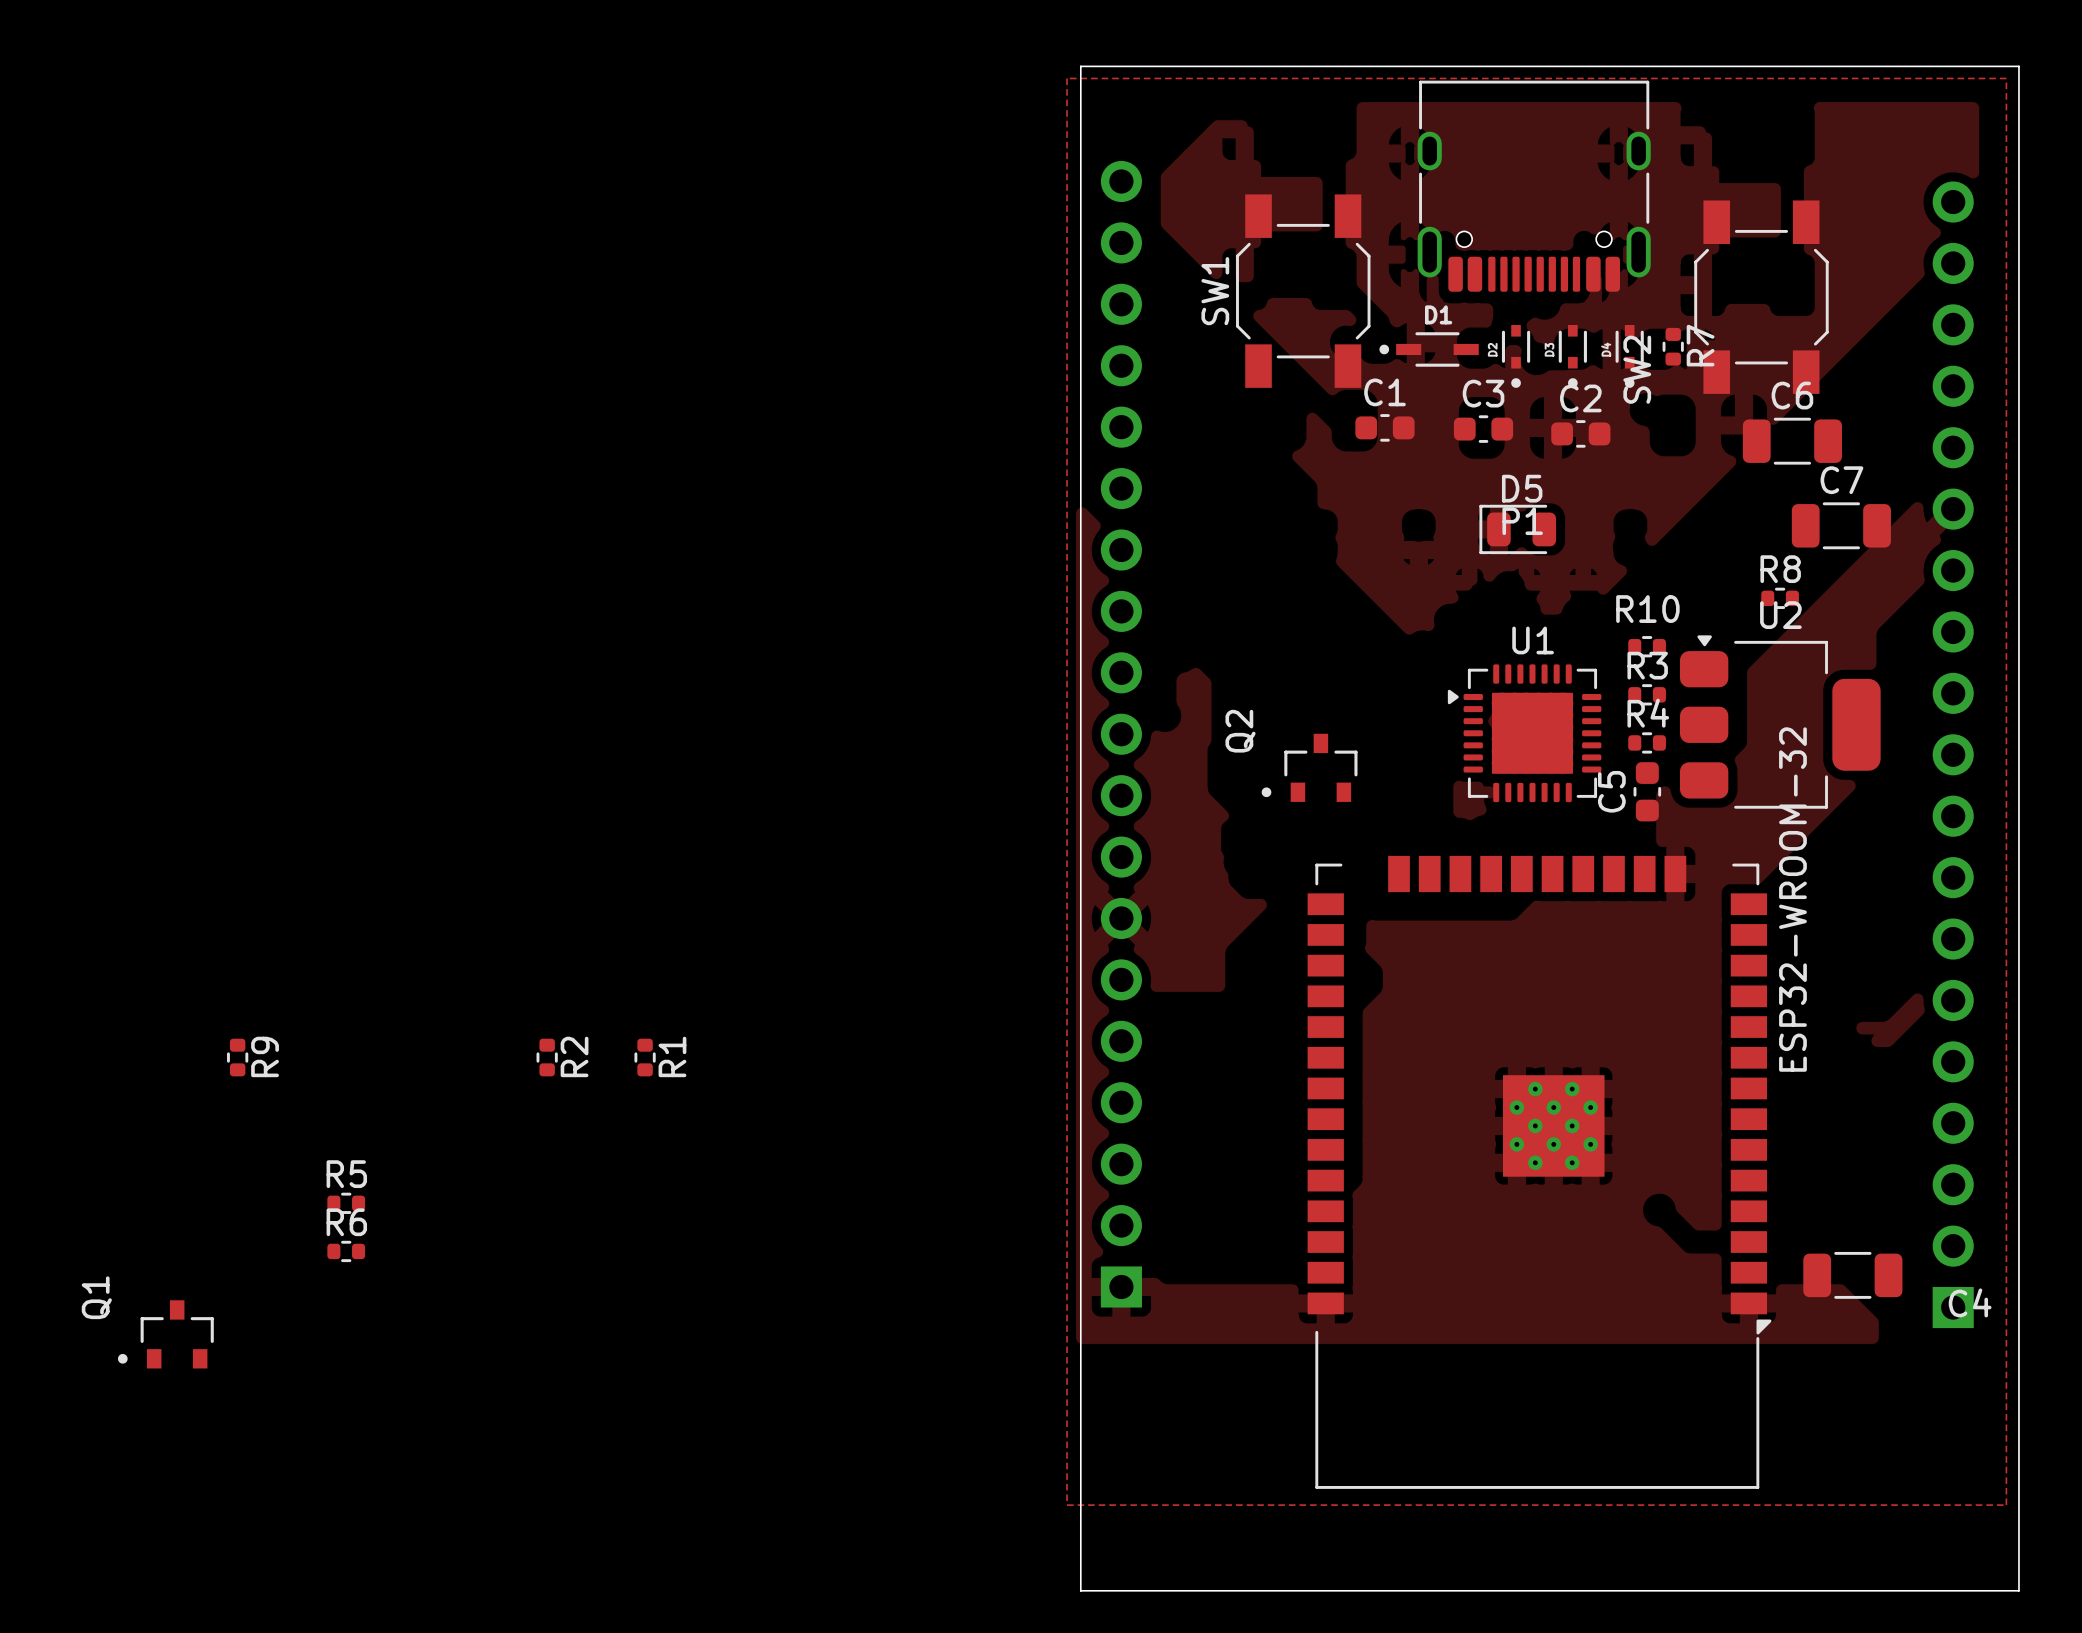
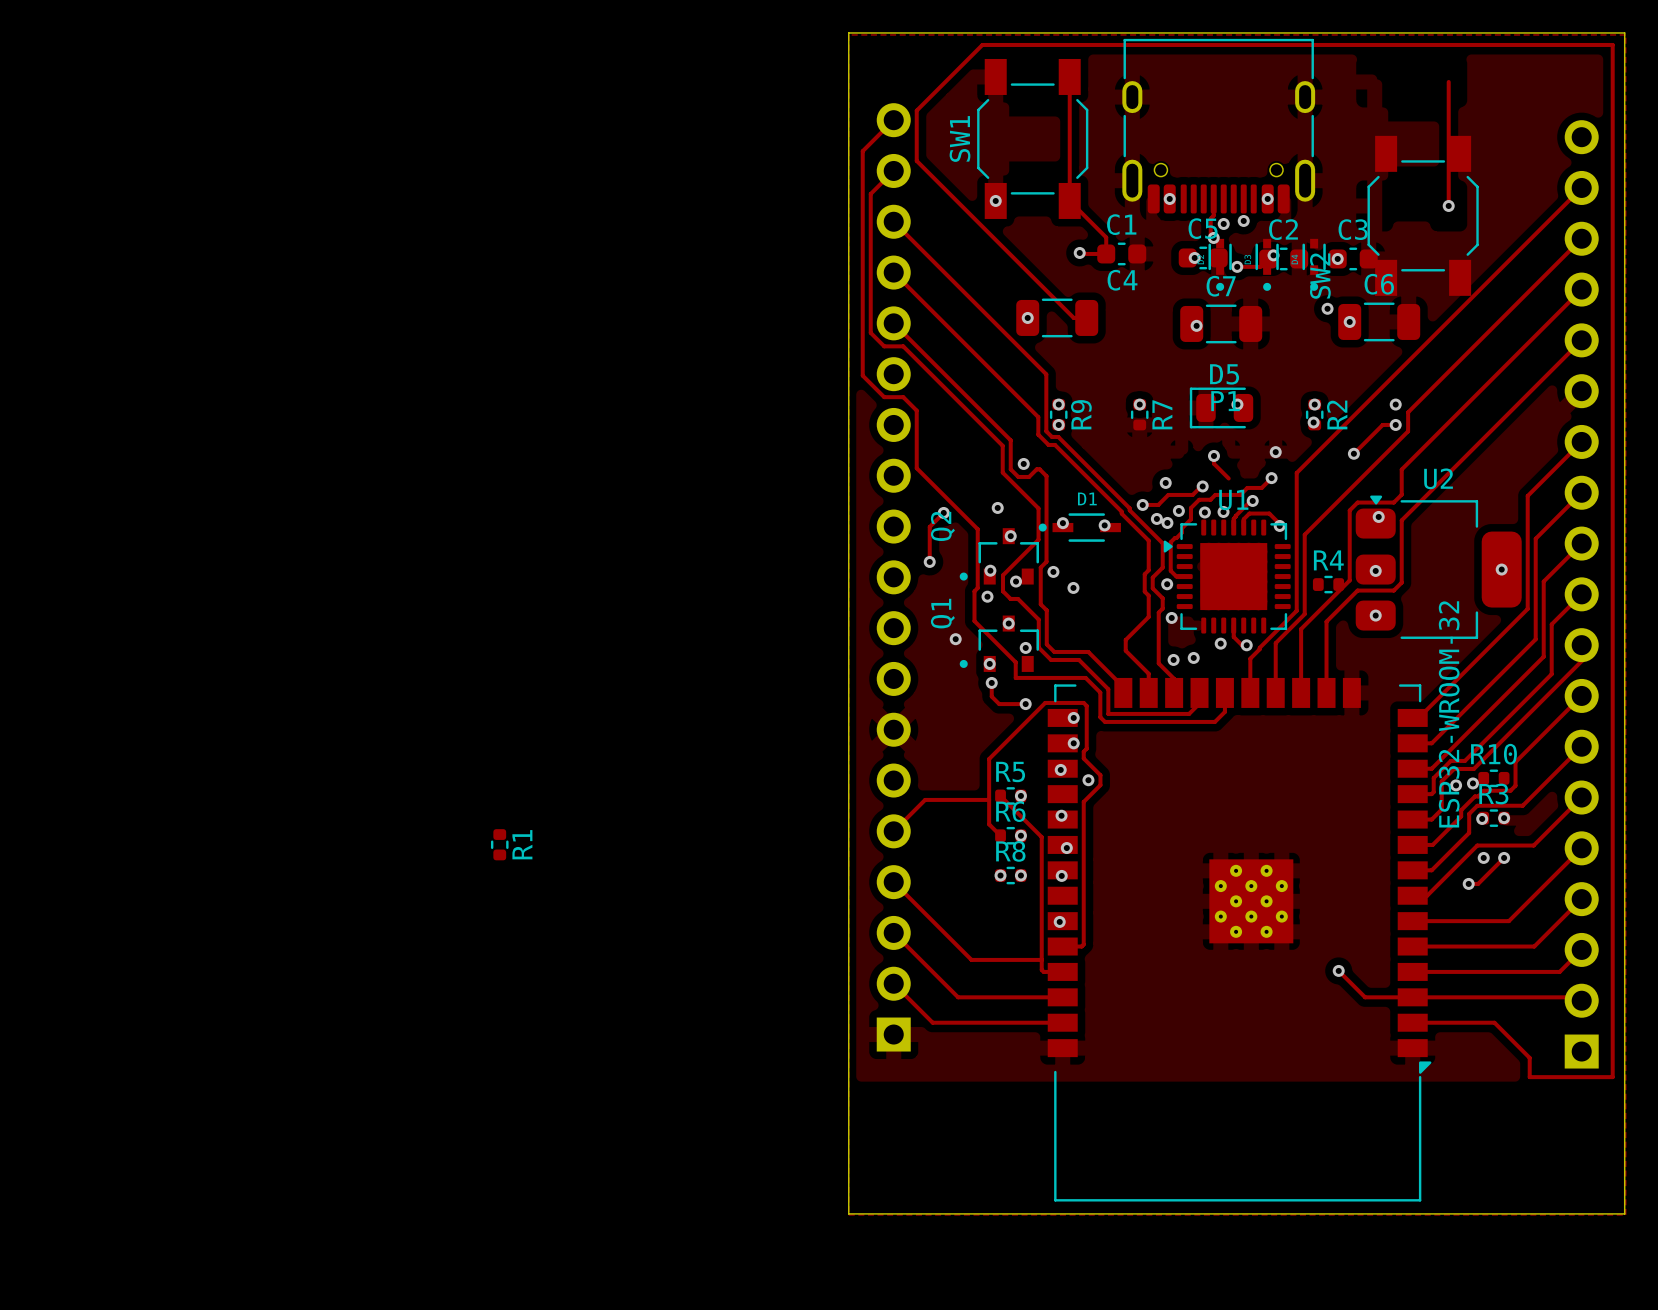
board edge: (1080, 66) (2018, 66) (2018, 1590) (1080, 1590) (1080, 66) -> (848, 32) (848, 1213) (1624, 1213) (1624, 32) (848, 32)
track: none -> (1069, 76) (1069, 200) (1106, 237) (1106, 253) (1079, 252)
track: none -> (1448, 81) (1448, 205)
track: none -> (893, 120) (862, 151) (862, 375) (884, 397) (903, 397) (916, 410) (916, 468) (977, 529) (977, 588) (974, 591) (974, 621) (1015, 662) (1015, 677) (1085, 677) (1100, 692) (1100, 717) (1105, 721) (1214, 721) (1224, 711) (1224, 692)
P1 position: (1534, 186) -> (1218, 126)
track: none -> (893, 170) (870, 193) (870, 332) (884, 346) (903, 346) (1002, 445) (1002, 472) (1038, 508) (1038, 539) (1003, 575) (1003, 591) (1010, 598) (1018, 598) (1038, 619) (1038, 647) (1051, 659) (1079, 659) (1108, 689) (1108, 713) (1189, 713) (1199, 703) (1199, 692)
track: none -> (1581, 187) (1296, 472) (1296, 610) (1250, 658) (1250, 692)
via: none -> (1169, 198)
track: none -> (1213, 198) (1213, 215) (1210, 218) (1210, 234) (1213, 237)
via: none -> (1267, 198)
via: none -> (995, 200)
via: none -> (1448, 205)
SW1 position: (1303, 291) -> (1032, 138)
via: none -> (1243, 220)
track: none -> (893, 221) (1046, 374) (1046, 431) (1051, 436) (1058, 436) (1162, 543) (1162, 567) (1152, 577) (1152, 588) (1162, 598) (1162, 608) (1158, 612) (1158, 663) (1174, 678) (1174, 692)
via: none -> (1223, 223)
via: none -> (1213, 237)
track: none -> (1581, 238) (1408, 412) (1408, 431) (1304, 534) (1304, 614) (1275, 643) (1275, 692)
via: none -> (1079, 252)
via: none -> (1273, 255)
R7 position: (1673, 346) -> (1139, 414)
via: none -> (1194, 257)
D1 position: (1429, 349) -> (1079, 527)
track: none -> (1268, 258) (1260, 266) (1237, 266)
via: none -> (1337, 258)
via: none -> (1237, 266)
track: none -> (893, 272) (1038, 417) (1038, 434) (1048, 444) (1055, 444) (1148, 540) (1148, 570) (1144, 574) (1144, 591) (1148, 595) (1148, 616) (1125, 639) (1125, 650) (1148, 673) (1148, 692)
track: none -> (1581, 289) (1401, 469) (1401, 494) (1393, 502) (1357, 502) (1349, 510) (1349, 580) (1301, 629) (1301, 692)
via: none -> (1327, 308)
via: none -> (1027, 317)
track: none -> (1086, 317) (1073, 317) (916, 160) (916, 110) (982, 44) (1612, 44) (1612, 1077) (1529, 1077) (1529, 1057) (1494, 1022) (1412, 1022)
via: none -> (1349, 321)
track: none -> (893, 323) (1010, 440) (1010, 469) (1018, 476) (1029, 476) (1036, 469) (1039, 469) (1046, 476) (1046, 561) (1040, 567) (1040, 604) (1046, 610) (1046, 644) (1054, 651) (1088, 651) (1123, 686) (1123, 692)
C1 position: (1384, 427) -> (1121, 253)
C3 position: (1483, 429) -> (1353, 258)
via: none -> (1196, 325)
C2 position: (1580, 433) -> (1283, 258)
C6 position: (1792, 441) -> (1379, 321)
track: none -> (1581, 340) (1401, 520) (1401, 582) (1393, 590) (1357, 590) (1326, 621) (1326, 692)
via: none -> (1058, 404)
via: none -> (1139, 404)
via: none -> (1237, 404)
via: none -> (1314, 404)
via: none -> (1395, 404)
C7 position: (1841, 525) -> (1221, 323)
via: none -> (1313, 422)
via: none -> (1058, 424)
track: none -> (1395, 424) (1382, 424) (1353, 453)
via: none -> (1395, 424)
track: none -> (1581, 441) (1527, 495) (1527, 608) (1418, 717) (1412, 717)
via: none -> (1275, 452)
via: none -> (1353, 453)
track: none -> (1213, 455) (1213, 463) (1228, 478)
via: none -> (1213, 455)
via: none -> (1023, 463)
R8 position: (1780, 598) -> (1010, 875)
R10 name position: R10 (1647, 609) -> R10 (1493, 754)
track: none -> (1271, 478) (1261, 487) (1247, 487) (1240, 494) (1215, 494) (1210, 499) (1199, 499) (1190, 508) (1190, 519) (1181, 528) (1181, 532) (1170, 542) (1170, 570) (1176, 576) (1184, 576)
via: none -> (1271, 478)
via: none -> (1165, 482)
track: none -> (1202, 486) (1192, 494) (1168, 494) (1158, 504) (1142, 504)
via: none -> (1202, 486)
track: none -> (1581, 492) (1535, 538) (1535, 639) (1431, 743) (1412, 743)
track: none -> (1252, 500) (1235, 515) (1233, 527)
via: none -> (1252, 500)
via: none -> (1142, 504)
R10 position: (1647, 646) -> (1493, 778)
via: none -> (997, 507)
via: none -> (1178, 510)
via: none -> (1204, 512)
via: none -> (1223, 511)
track: none -> (943, 512) (929, 526) (929, 561)
via: none -> (943, 512)
via: none -> (1378, 516)
via: none -> (1156, 518)
via: none -> (1062, 523)
via: none -> (1167, 522)
via: none -> (1104, 525)
track: none -> (1279, 525) (1269, 513) (1249, 513) (1243, 519) (1243, 527)
via: none -> (1279, 525)
via: none -> (1010, 536)
track: none -> (1581, 543) (1543, 581) (1543, 656) (1431, 768) (1412, 768)
R3 position: (1647, 694) -> (1493, 818)
via: none -> (929, 561)
via: none -> (1501, 569)
via: none -> (990, 570)
via: none -> (1375, 570)
via: none -> (1053, 571)
via: none -> (1016, 581)
via: none -> (1167, 584)
via: none -> (1073, 587)
track: none -> (1581, 594) (1551, 624) (1551, 674) (1464, 760) (1450, 760) (1433, 778) (1433, 792) (1431, 794) (1412, 794)
via: none -> (987, 596)
Q2 position: (1309, 767) -> (999, 556)
via: none -> (1375, 615)
via: none -> (1171, 617)
via: none -> (1008, 623)
C5 rotation: 0° (1647, 791) -> 90° clockwise (1203, 257)
C5 position: (1647, 791) -> (1203, 257)
track: none -> (1233, 625) (1233, 636) (1242, 645) (1246, 645)
via: none -> (955, 639)
via: none -> (1220, 643)
via: none -> (1246, 645)
track: none -> (1581, 645) (1581, 661) (1473, 768) (1454, 768) (1441, 781) (1441, 809) (1431, 819) (1412, 819)
via: none -> (1025, 647)
via: none -> (1193, 657)
via: none -> (1173, 659)
via: none -> (989, 663)
track: none -> (991, 682) (991, 696) (999, 704) (1025, 704)
via: none -> (991, 682)
track: none -> (1581, 695) (1515, 762) (1515, 785) (1510, 790) (1484, 790) (1478, 796) (1474, 796) (1461, 810) (1461, 816) (1432, 844) (1412, 844)
via: none -> (1025, 704)
via: none -> (1073, 717)
via: none -> (1073, 743)
track: none -> (1581, 746) (1522, 805) (1477, 805) (1469, 813) (1469, 832) (1431, 870) (1412, 870)
via: none -> (1060, 769)
via: none -> (1088, 780)
via: none -> (1472, 783)
via: none -> (1456, 785)
track: none -> (1000, 795) (1041, 837) (1041, 969) (1043, 971) (1062, 971)
via: none -> (1020, 795)
track: none -> (1581, 797) (1533, 845) (1477, 845) (1427, 895) (1412, 895)
track: none -> (989, 799) (925, 799) (893, 831)
via: none -> (1061, 815)
via: none -> (1504, 818)
via: none -> (1482, 818)
track: none -> (1000, 835) (989, 824) (989, 759) (1045, 702) (1083, 702) (1086, 705) (1086, 748) (1083, 751) (1083, 758) (1100, 775) (1100, 785) (1083, 801) (1083, 944) (1081, 946) (1062, 946)
via: none -> (1020, 835)
R9 position: (237, 1057) -> (1058, 414)
R2 position: (547, 1057) -> (1314, 414)
via: none -> (1066, 848)
track: none -> (1581, 848) (1508, 921) (1412, 921)
via: none -> (1483, 857)
track: none -> (1504, 857) (1478, 883) (1468, 883)
via: none -> (1504, 857)
via: none -> (1000, 875)
via: none -> (1020, 875)
via: none -> (1061, 875)
track: none -> (893, 882) (971, 959) (1041, 959)
via: none -> (1468, 883)
track: none -> (1581, 899) (1534, 946) (1412, 946)
via: none -> (1059, 921)
track: none -> (893, 932) (958, 997) (1062, 997)
track: none -> (1581, 949) (1559, 971) (1412, 971)
R5 position: (346, 1203) -> (1010, 795)
track: none -> (1338, 970) (1365, 997) (1578, 997) (1581, 1000)
via: none -> (1338, 970)
track: none -> (893, 983) (932, 1022) (1062, 1022)
R6 position: (346, 1251) -> (1010, 835)
C4 position: (1852, 1275) -> (1057, 317)
C4 name position: C4 (1970, 1302) -> C4 (1122, 280)
Q1 position: (165, 1334) -> (999, 643)

